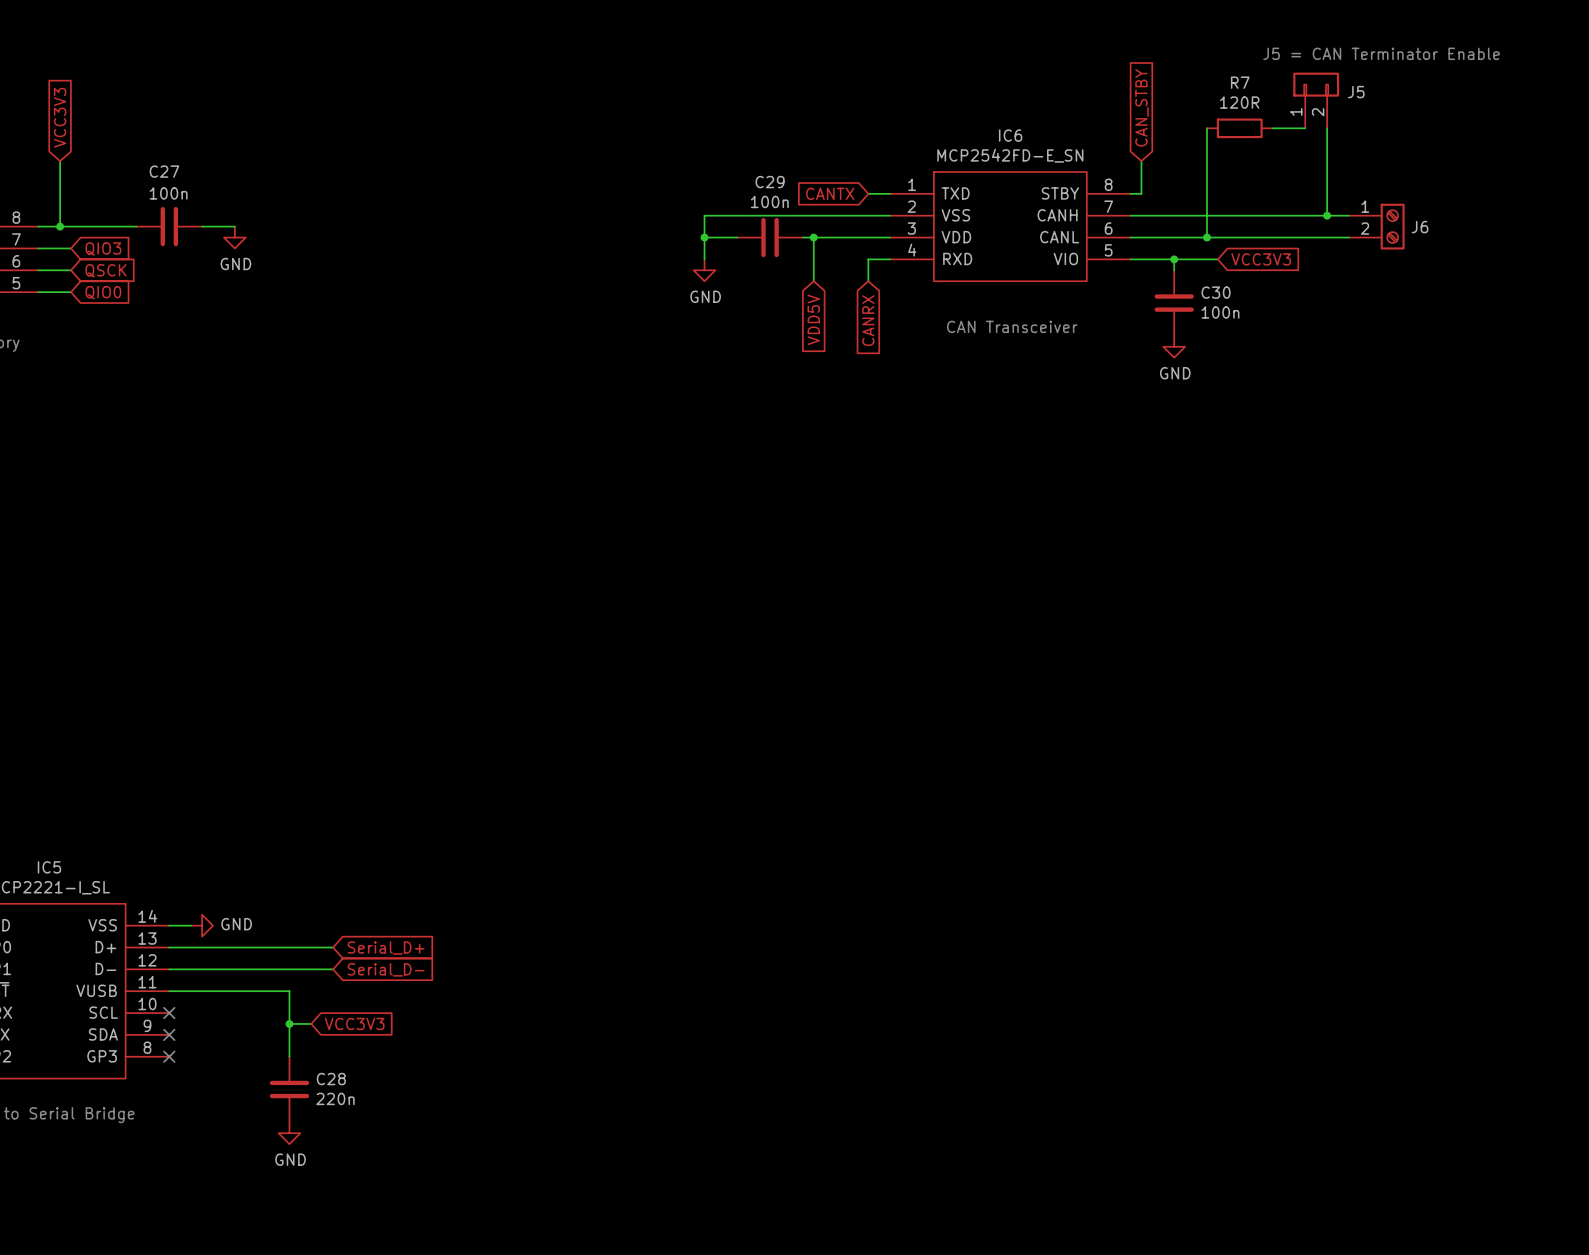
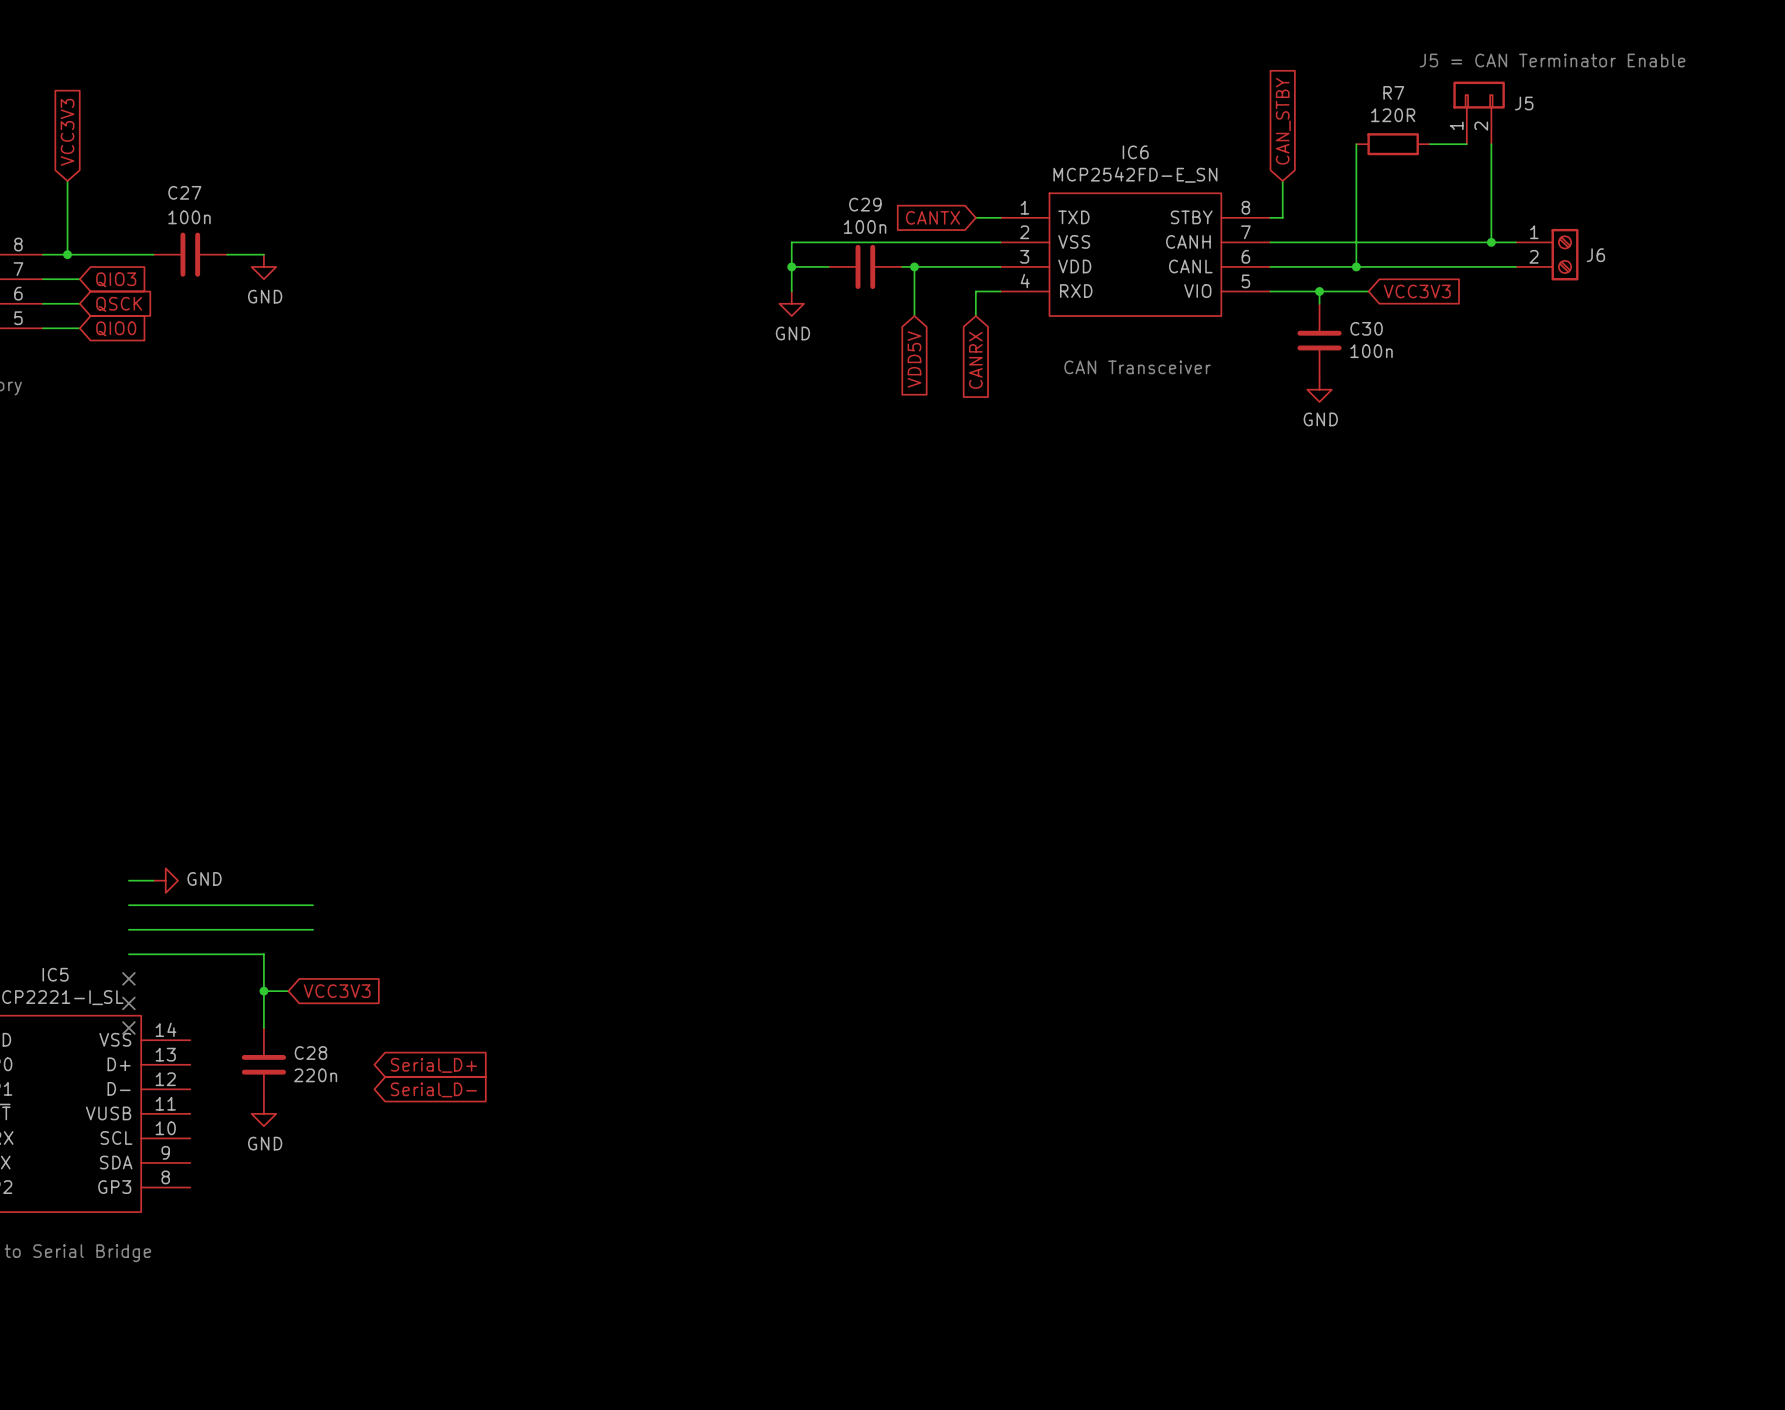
power symbol: none -> GND (165, 880)
no-connect mark: none -> (128, 978)
junction: none -> (263, 991)
no-connect mark: none -> (128, 1003)
no-connect mark: none -> (128, 1027)
wire: (169, 925) (191, 925) -> (128, 880) (153, 880)
power symbol rotation: 0° (202, 925) -> 90° clockwise (263, 1113)
power symbol position: GND (202, 925) -> GND (263, 1113)
wire: (169, 947) (333, 947) -> (128, 905) (313, 905)
wire: (169, 969) (333, 969) -> (128, 929) (313, 929)
wire: (169, 991) (289, 991) (289, 1056) -> (128, 954) (263, 954) (263, 1027)
no-connect mark: (169, 1013) -> none
wire: (289, 1023) (311, 1023) -> (263, 991) (288, 991)
junction: (289, 1023) -> none
global label position: VCC3V3 (354, 1023) -> VCC3V3 (337, 991)
no-connect mark: (169, 1034) -> none
no-connect mark: (169, 1056) -> none
C28 position: (289, 1089) -> (263, 1064)
power symbol: GND (289, 1133) -> none

